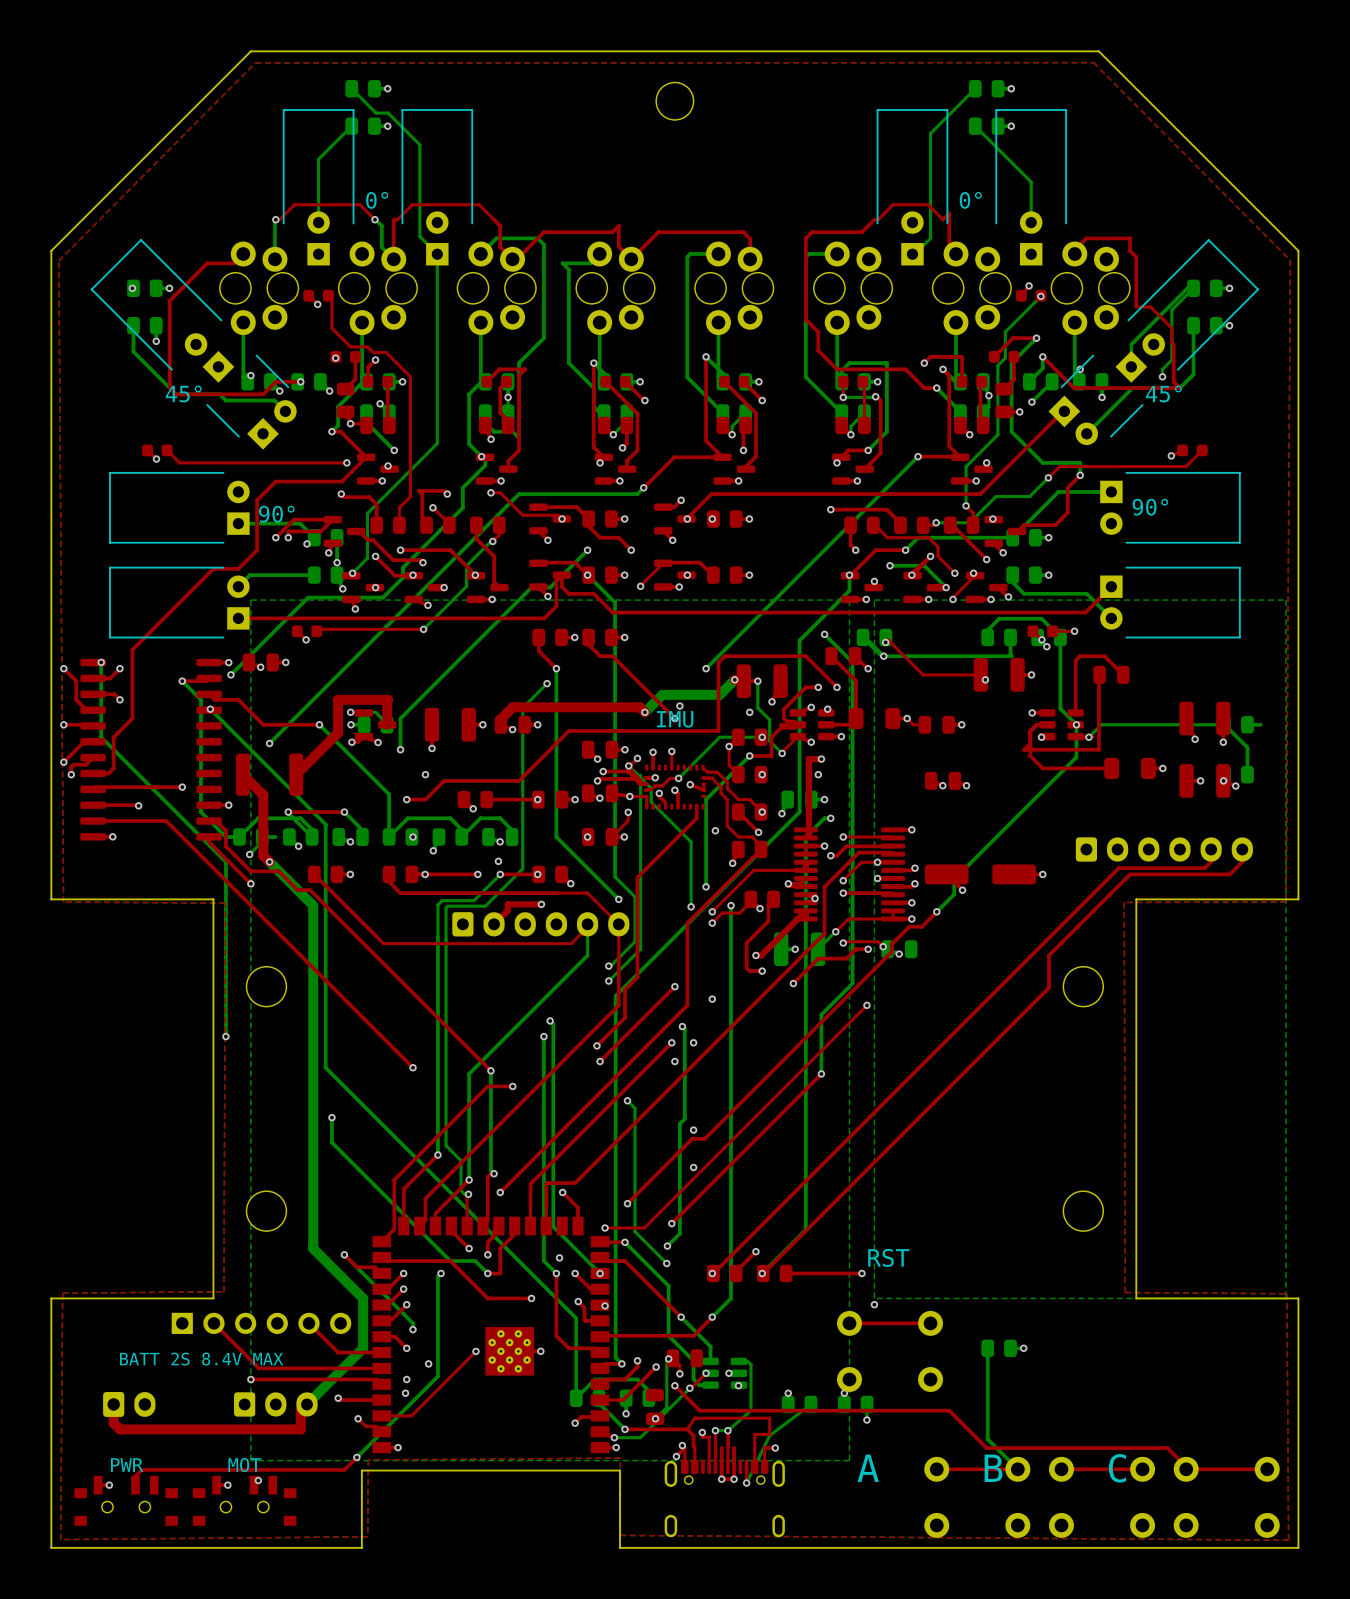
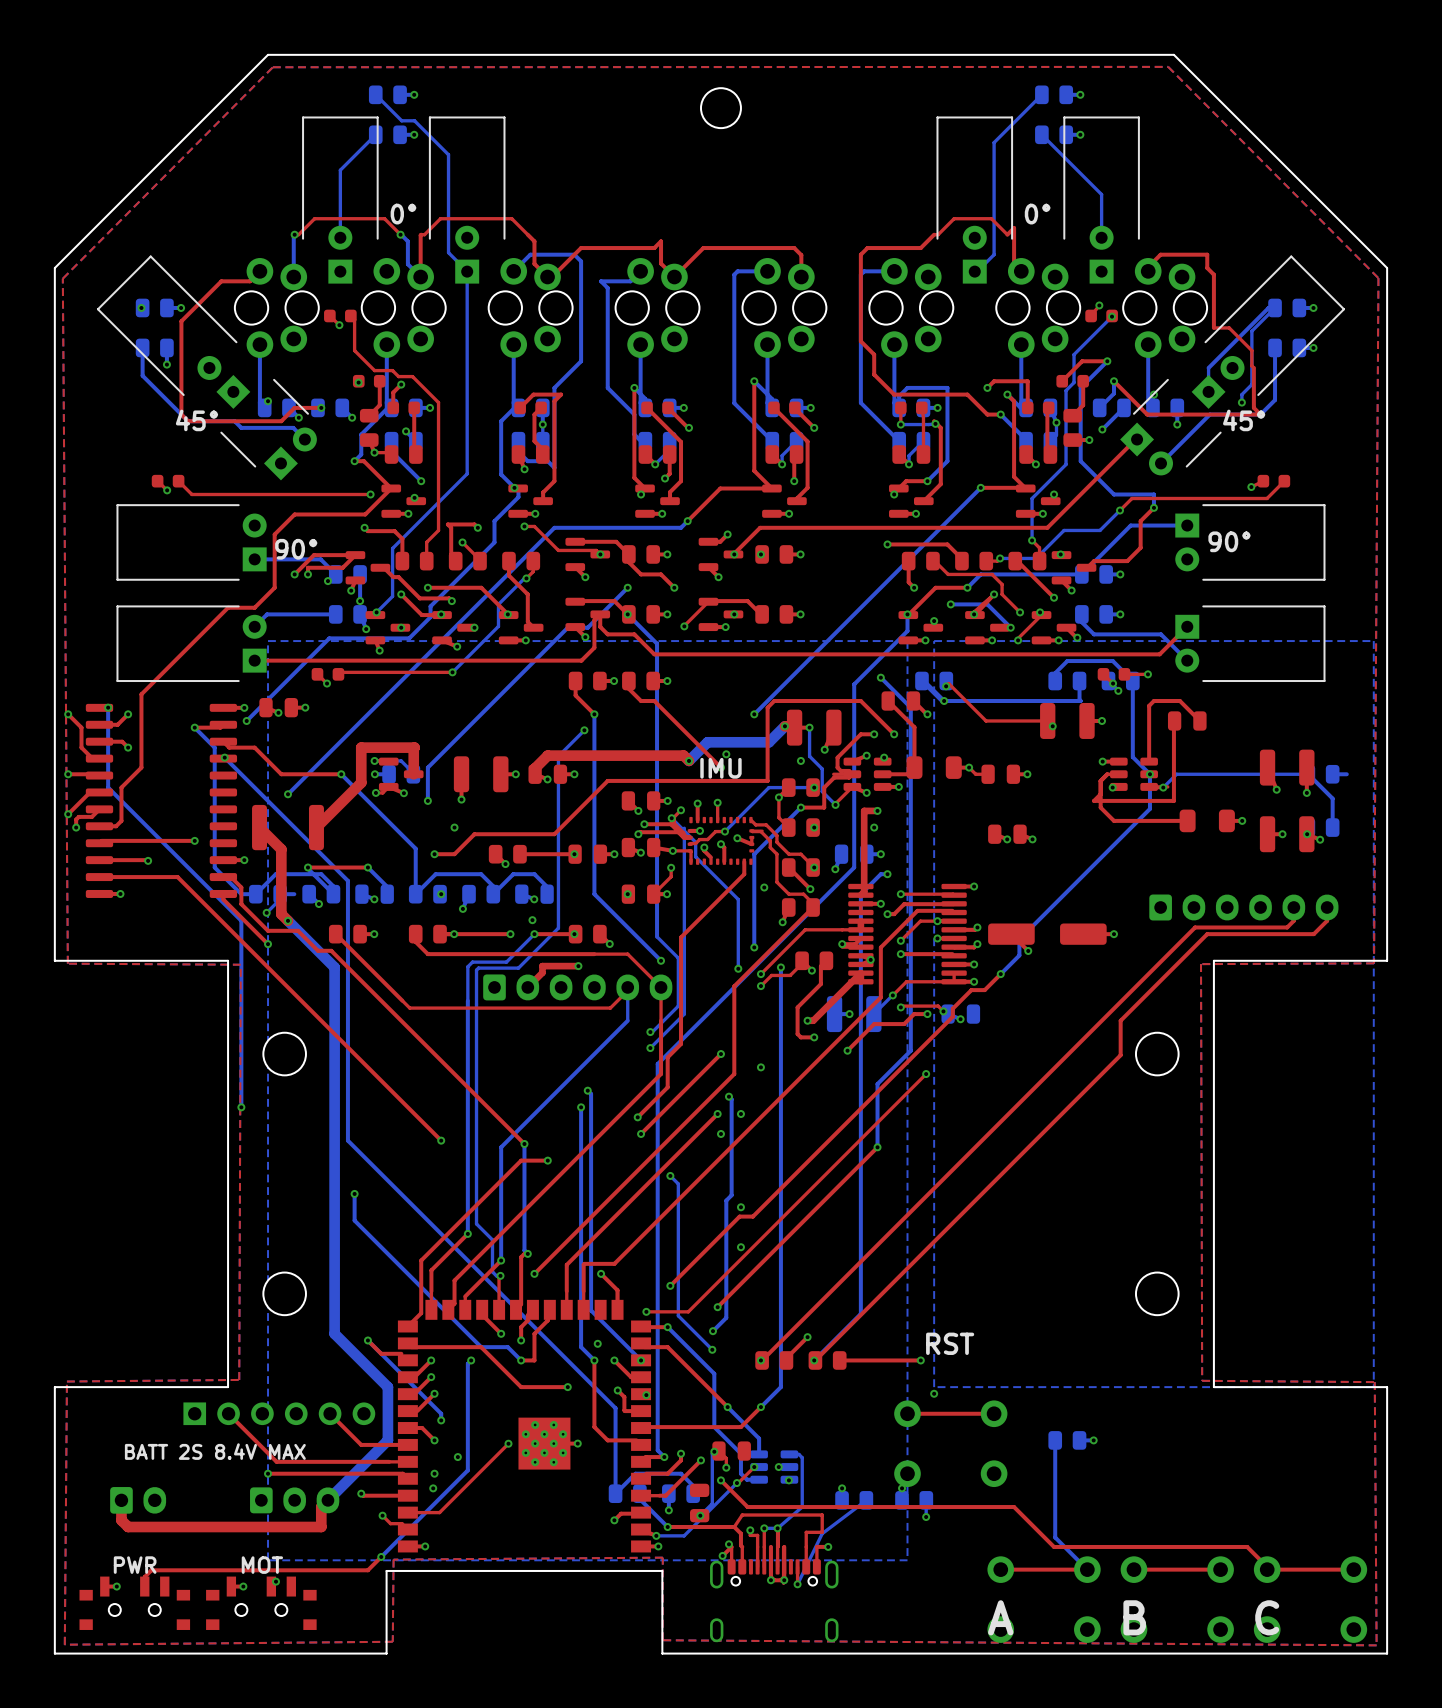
text position: A (868, 1468) -> A (1000, 1617)
text position: B (993, 1468) -> B (1134, 1617)
text position: C (1117, 1468) -> C (1267, 1617)

